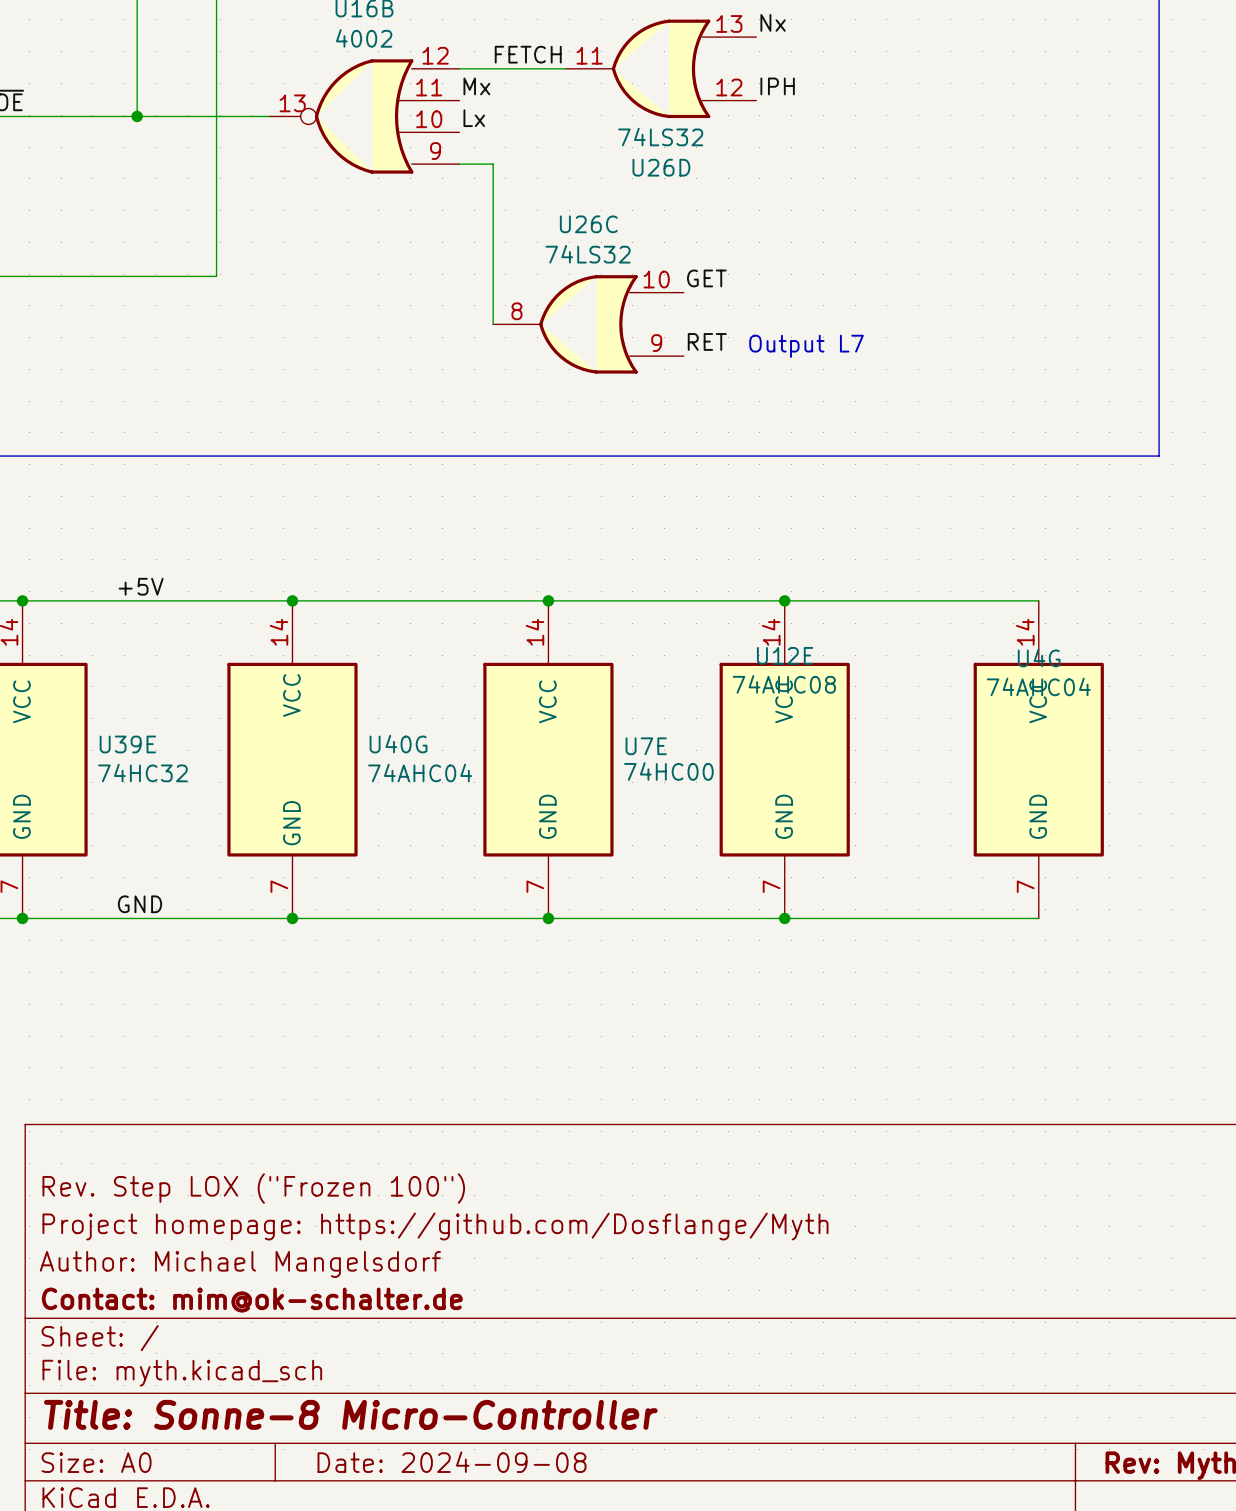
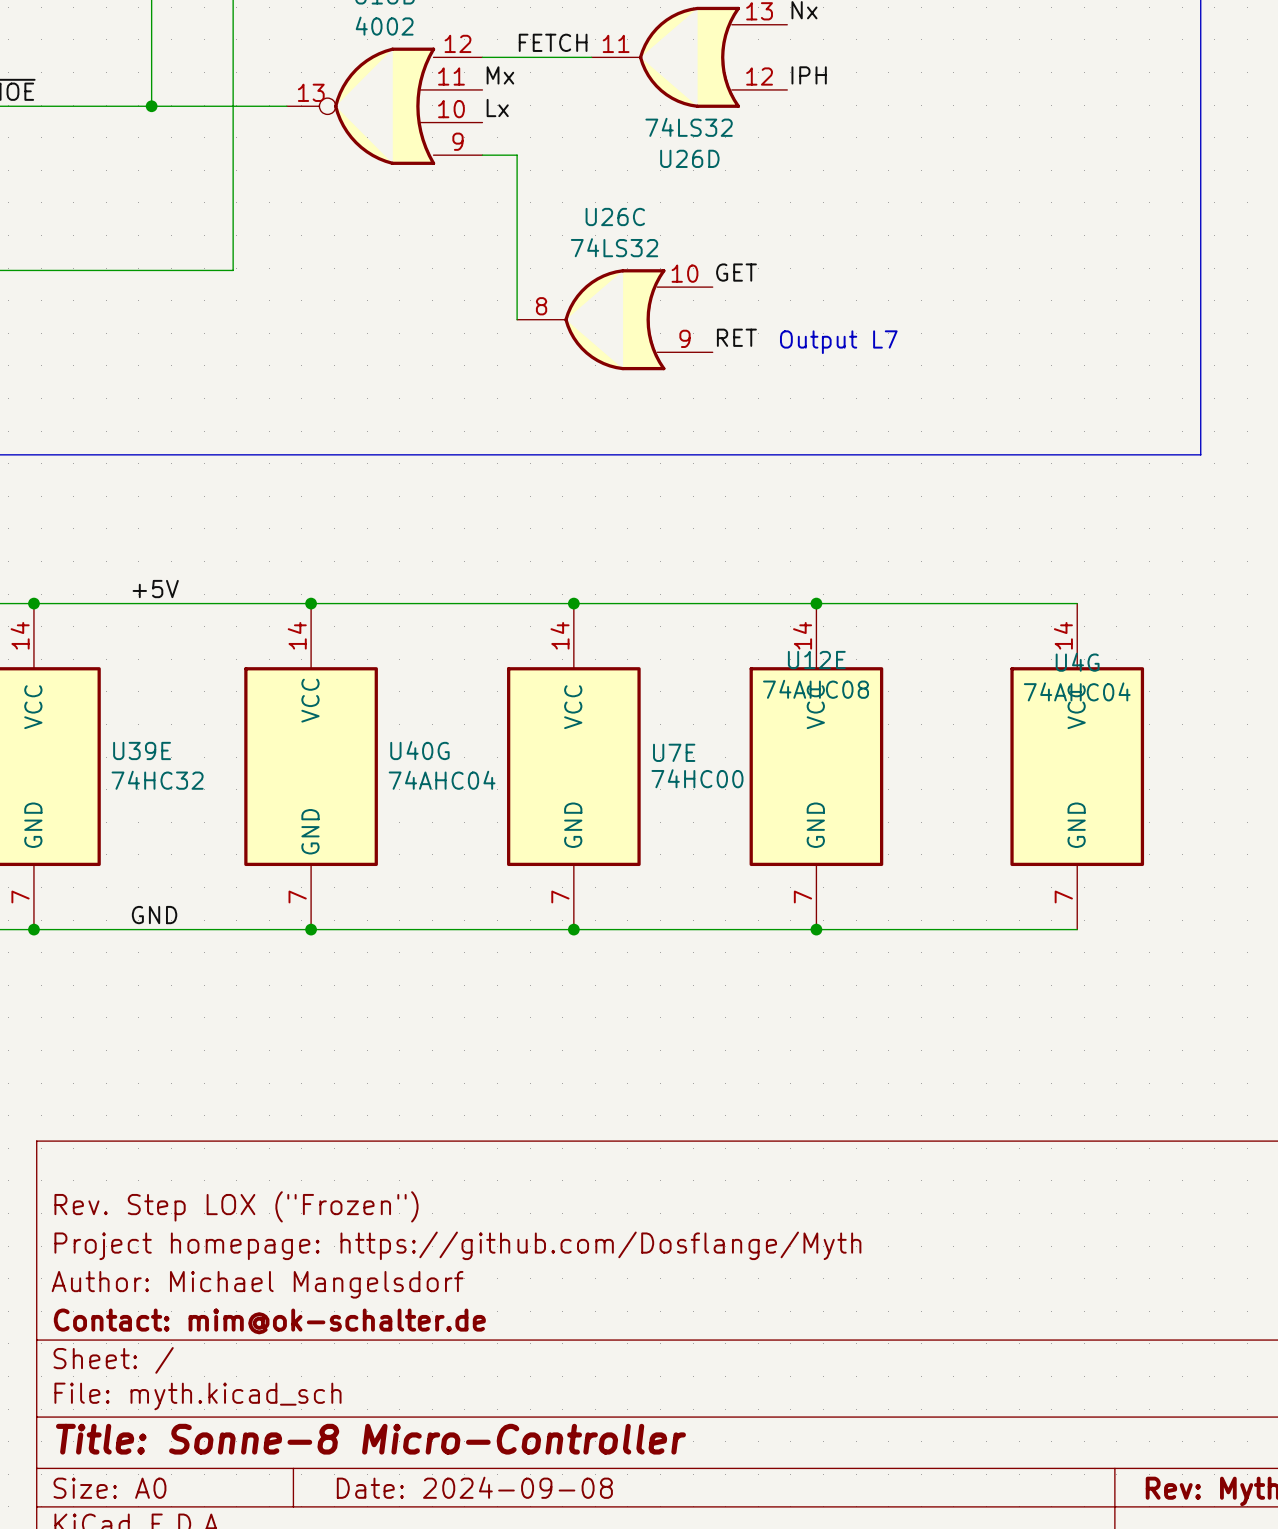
title block: Rev. Step LOX ("Frozen 100") (253, 1188) -> Rev. Step LOX ("Frozen") (236, 1206)

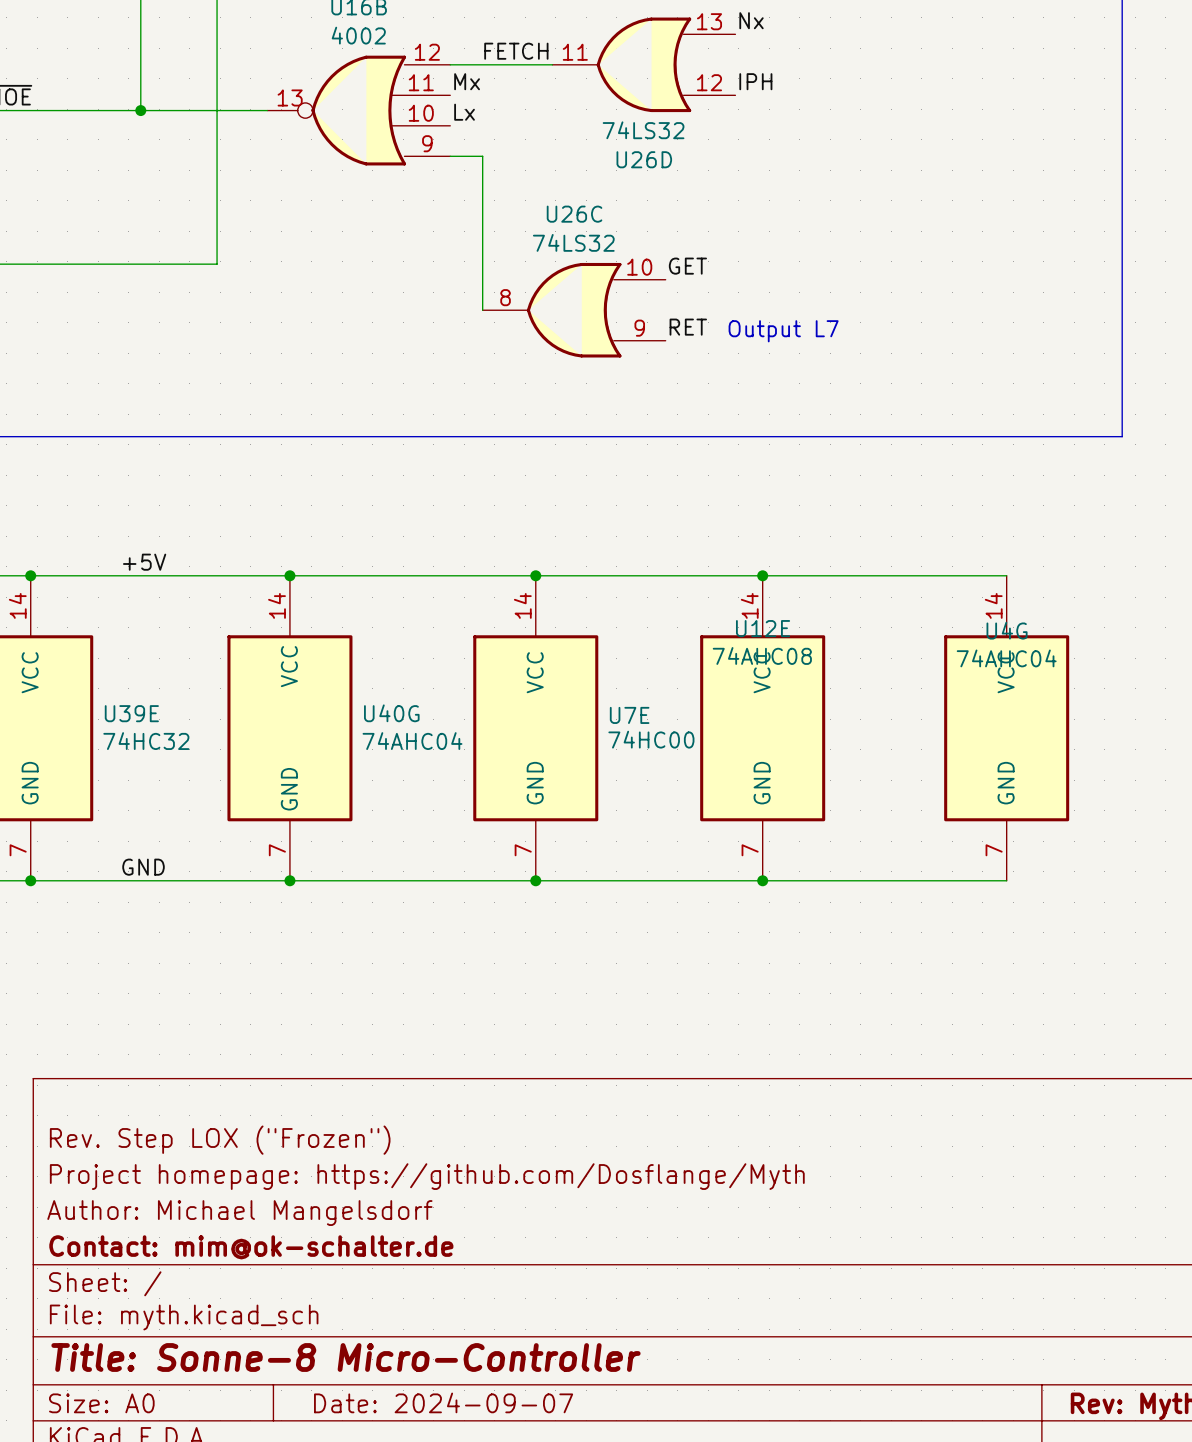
title block: Date: 2024-09-08 (474, 1487) -> Date: 2024-09-07 (443, 1402)

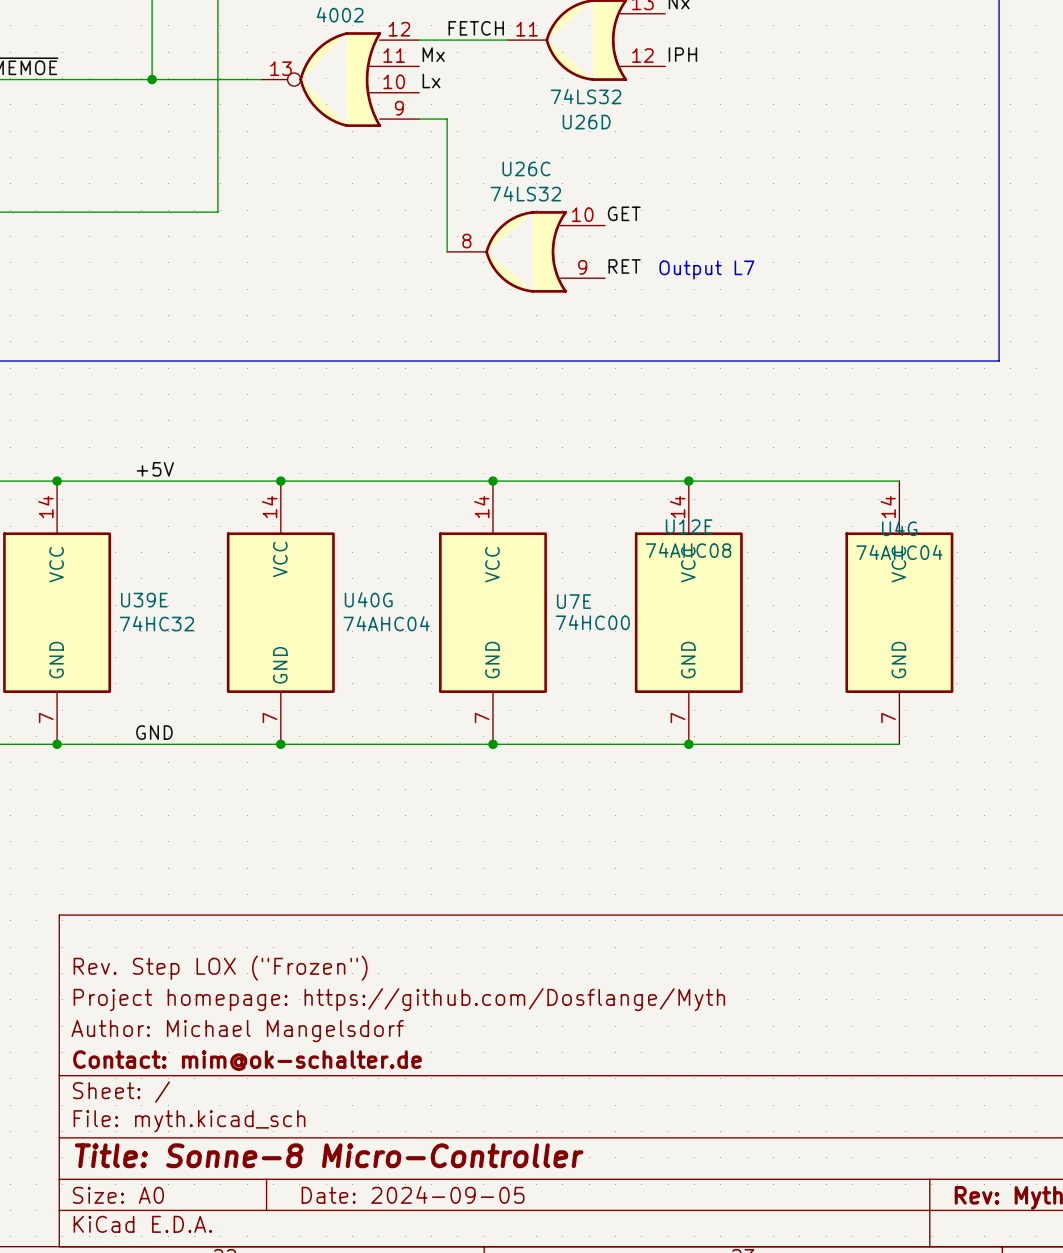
title block: Date: 2024-09-07 (443, 1402) -> Date: 2024-09-05 (413, 1194)

